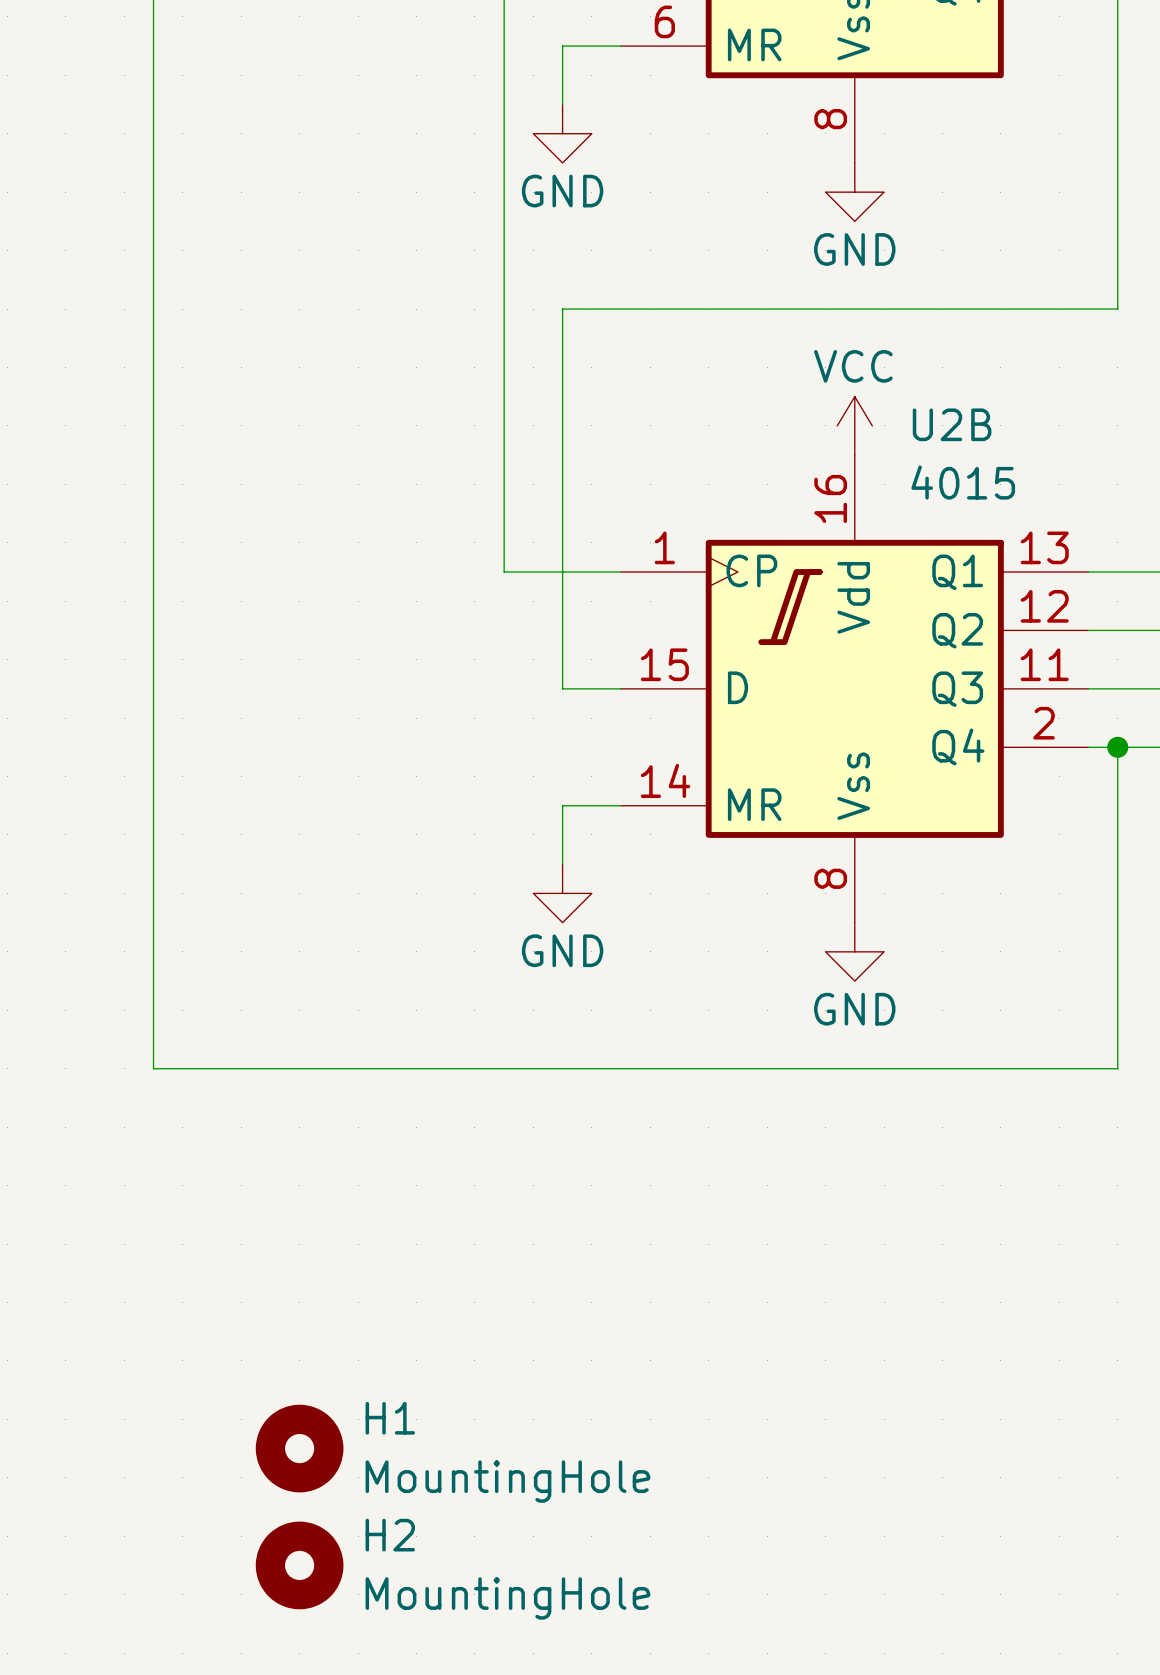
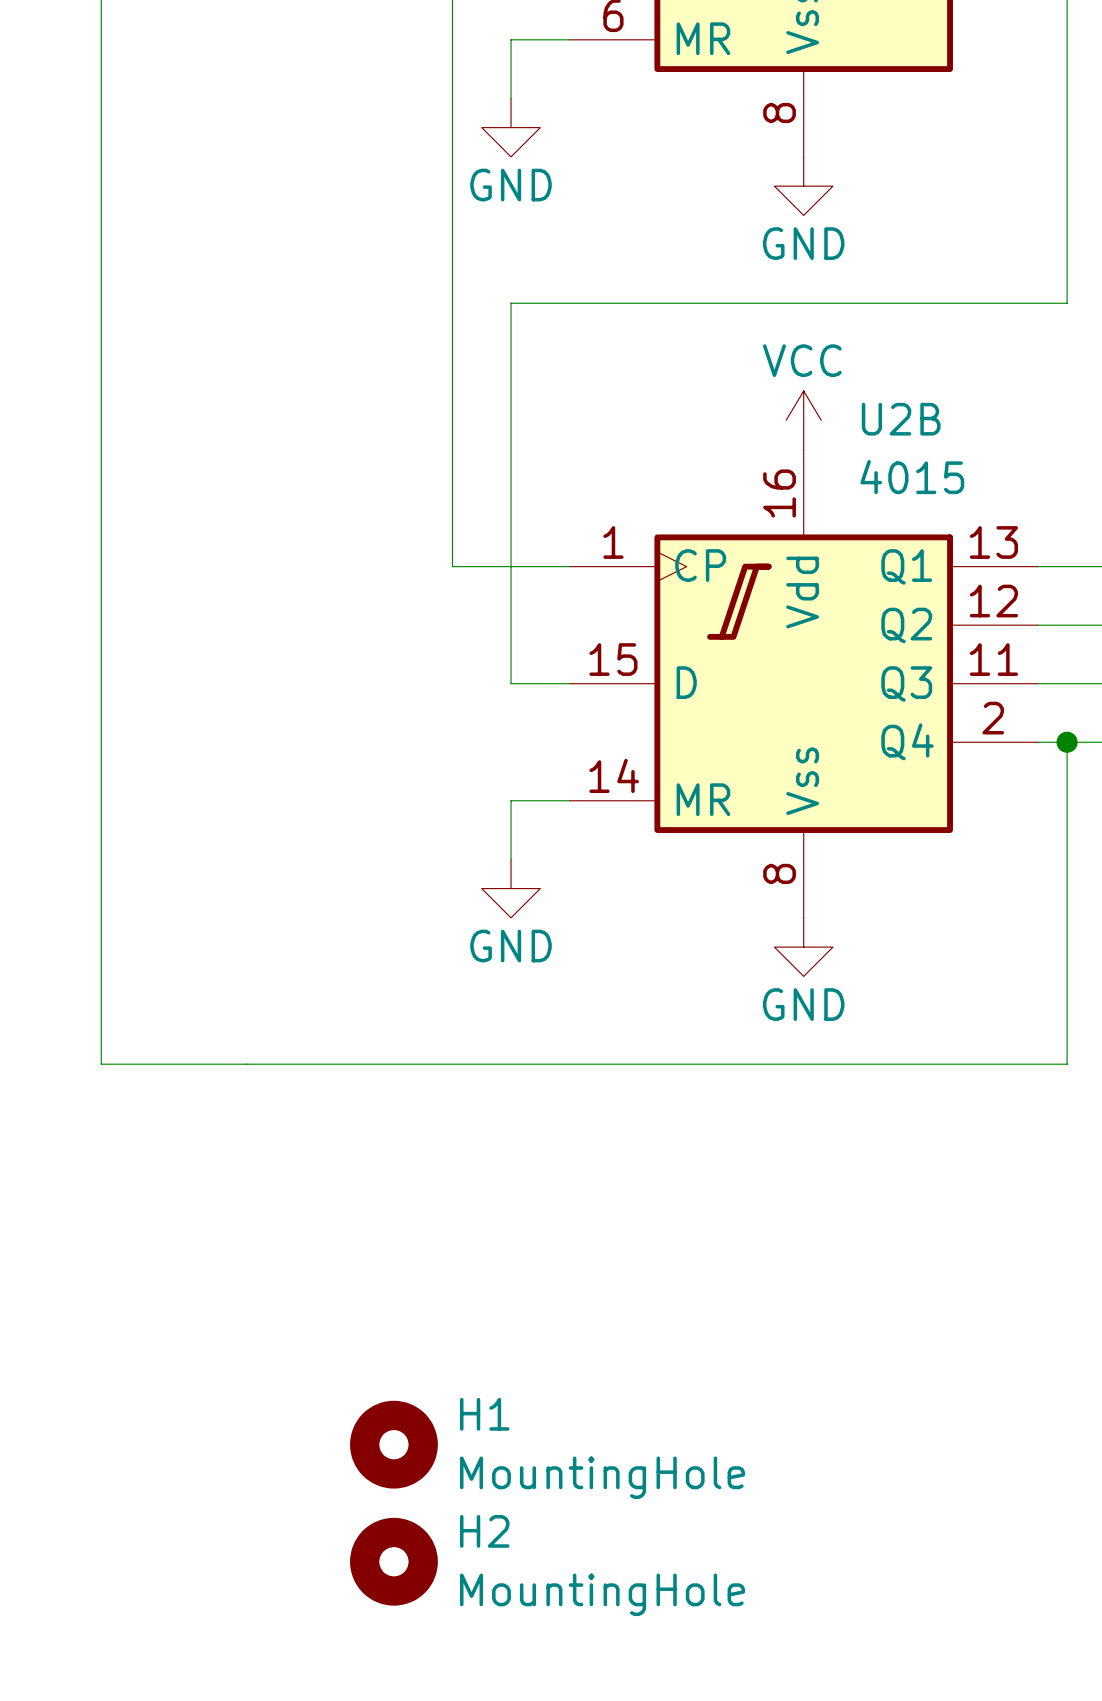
H1 position: (299, 1448) -> (393, 1444)
H2 position: (299, 1565) -> (393, 1561)

